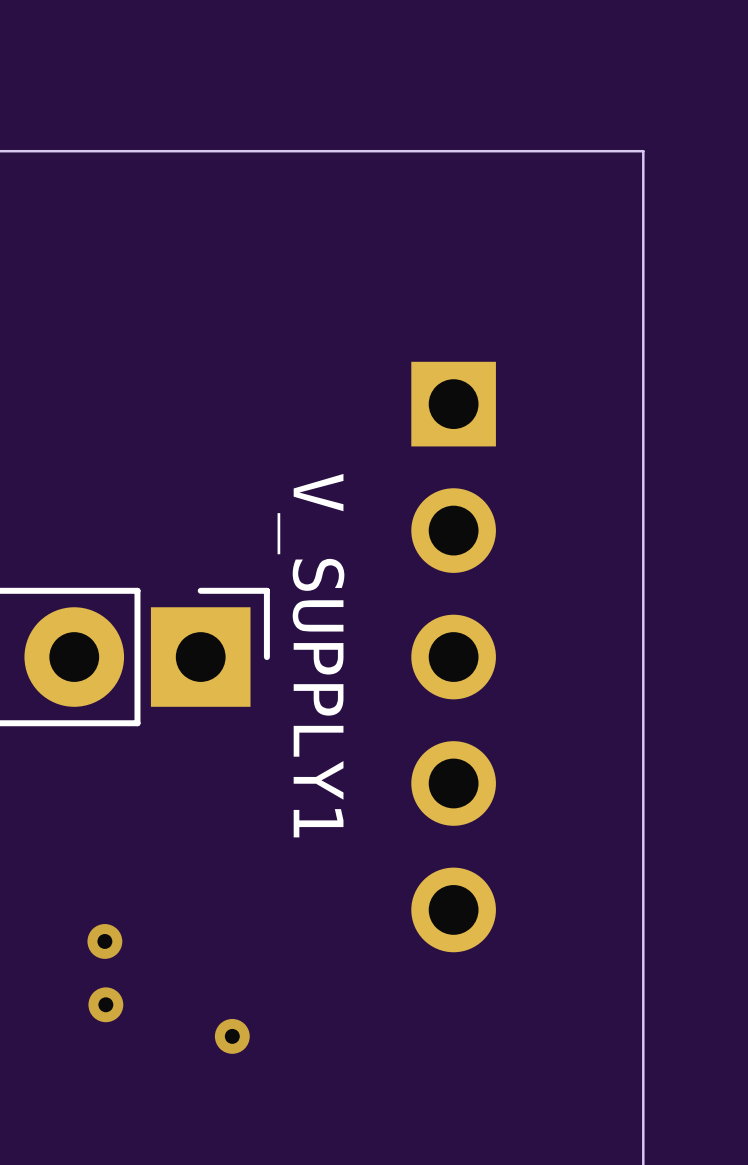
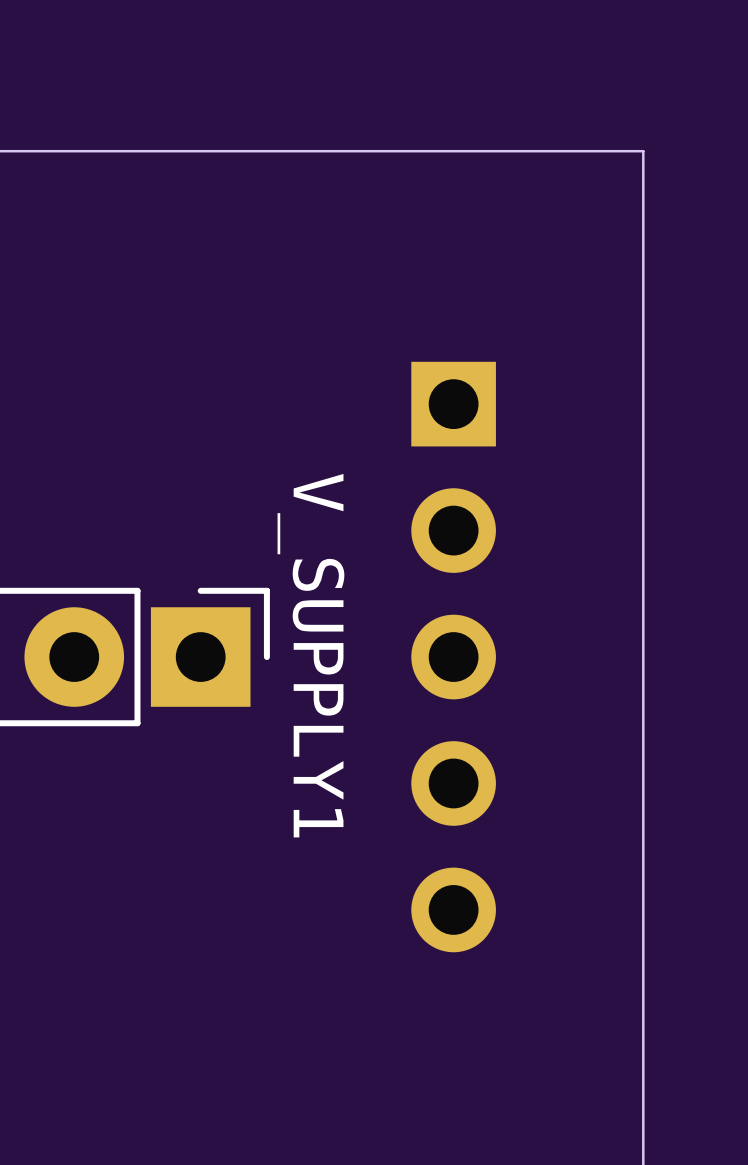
via: (104, 941) -> none
via: (105, 1004) -> none
via: (232, 1036) -> none

